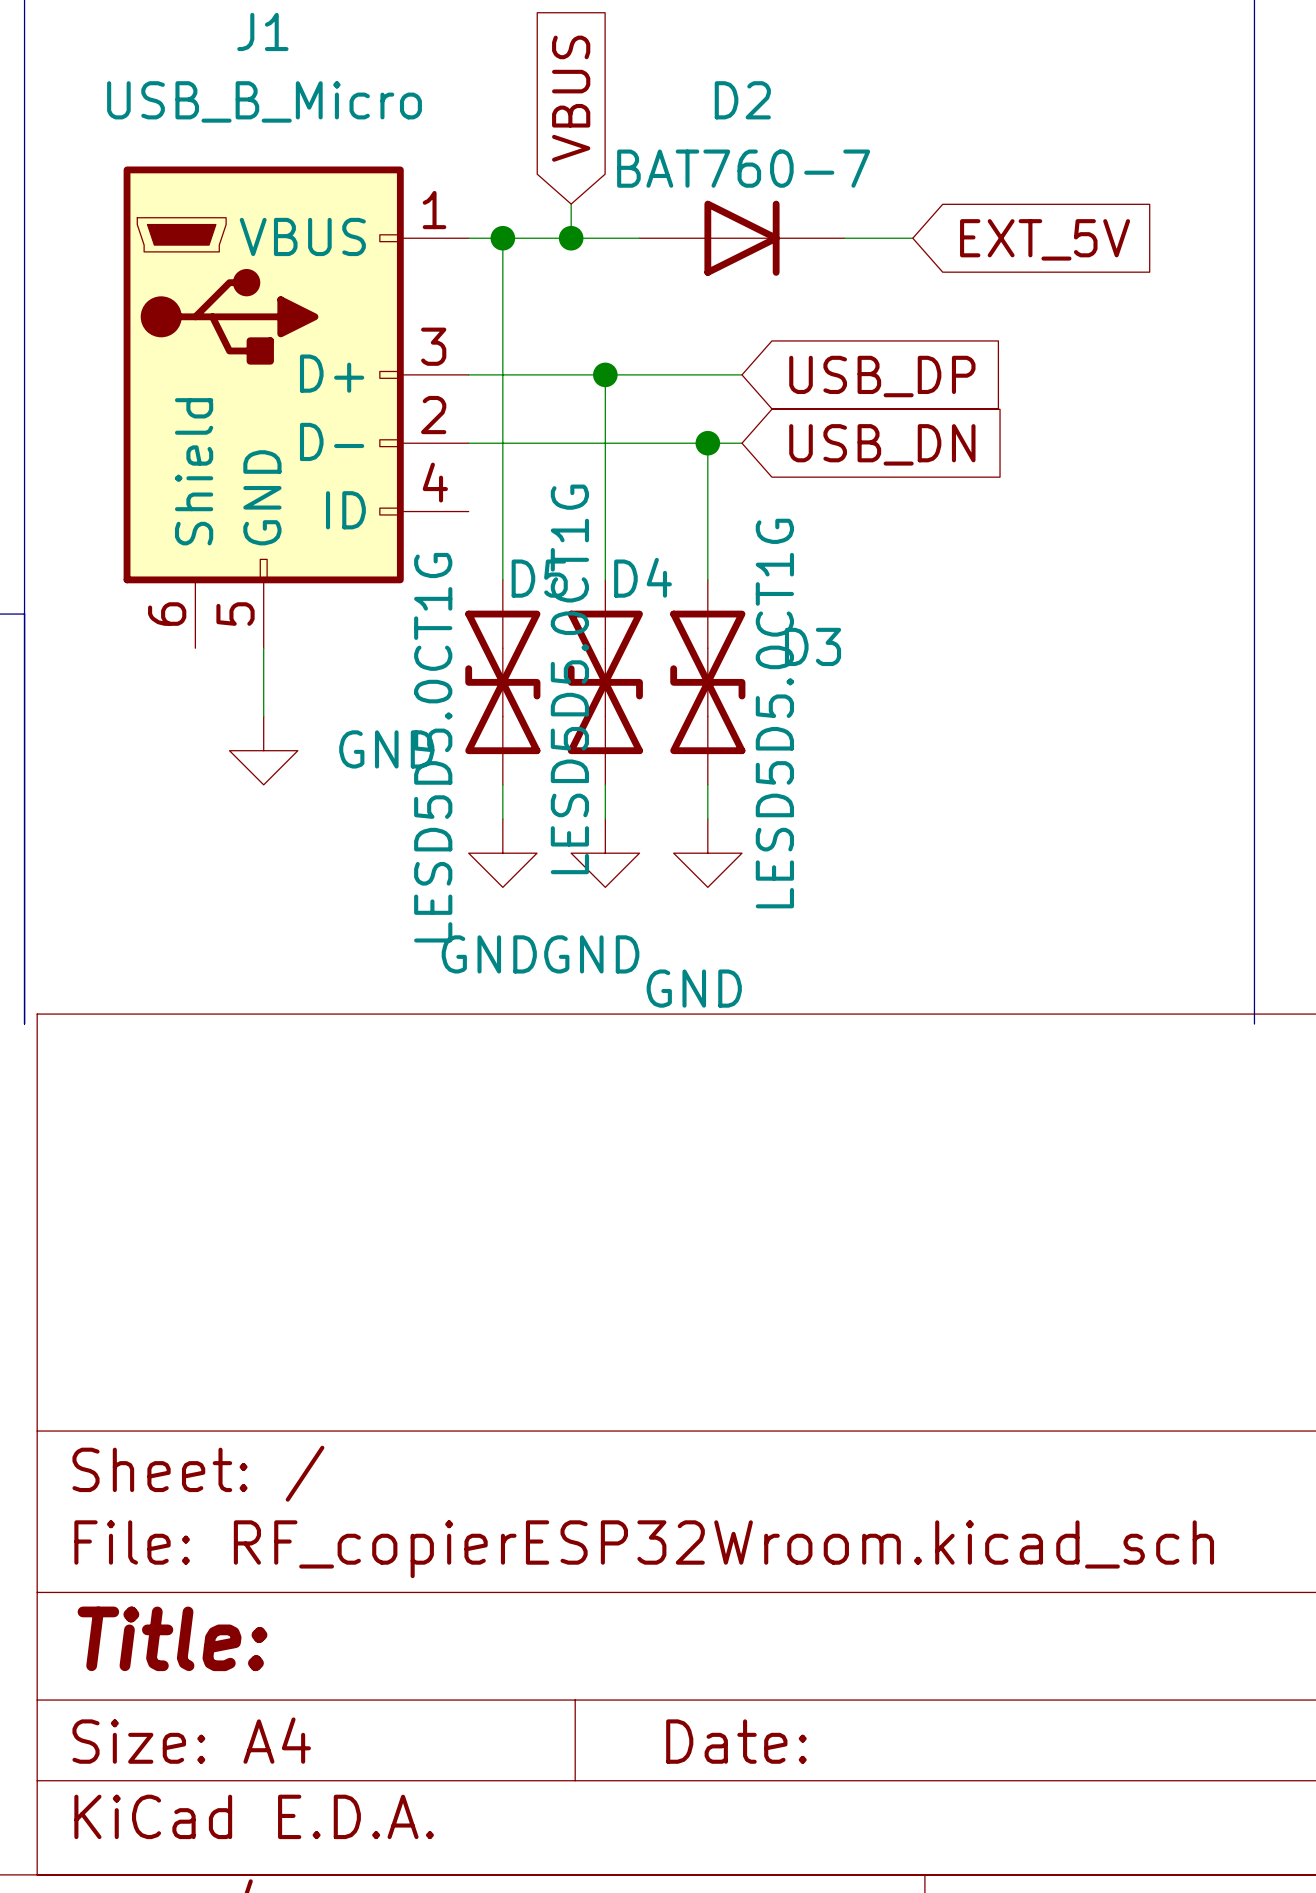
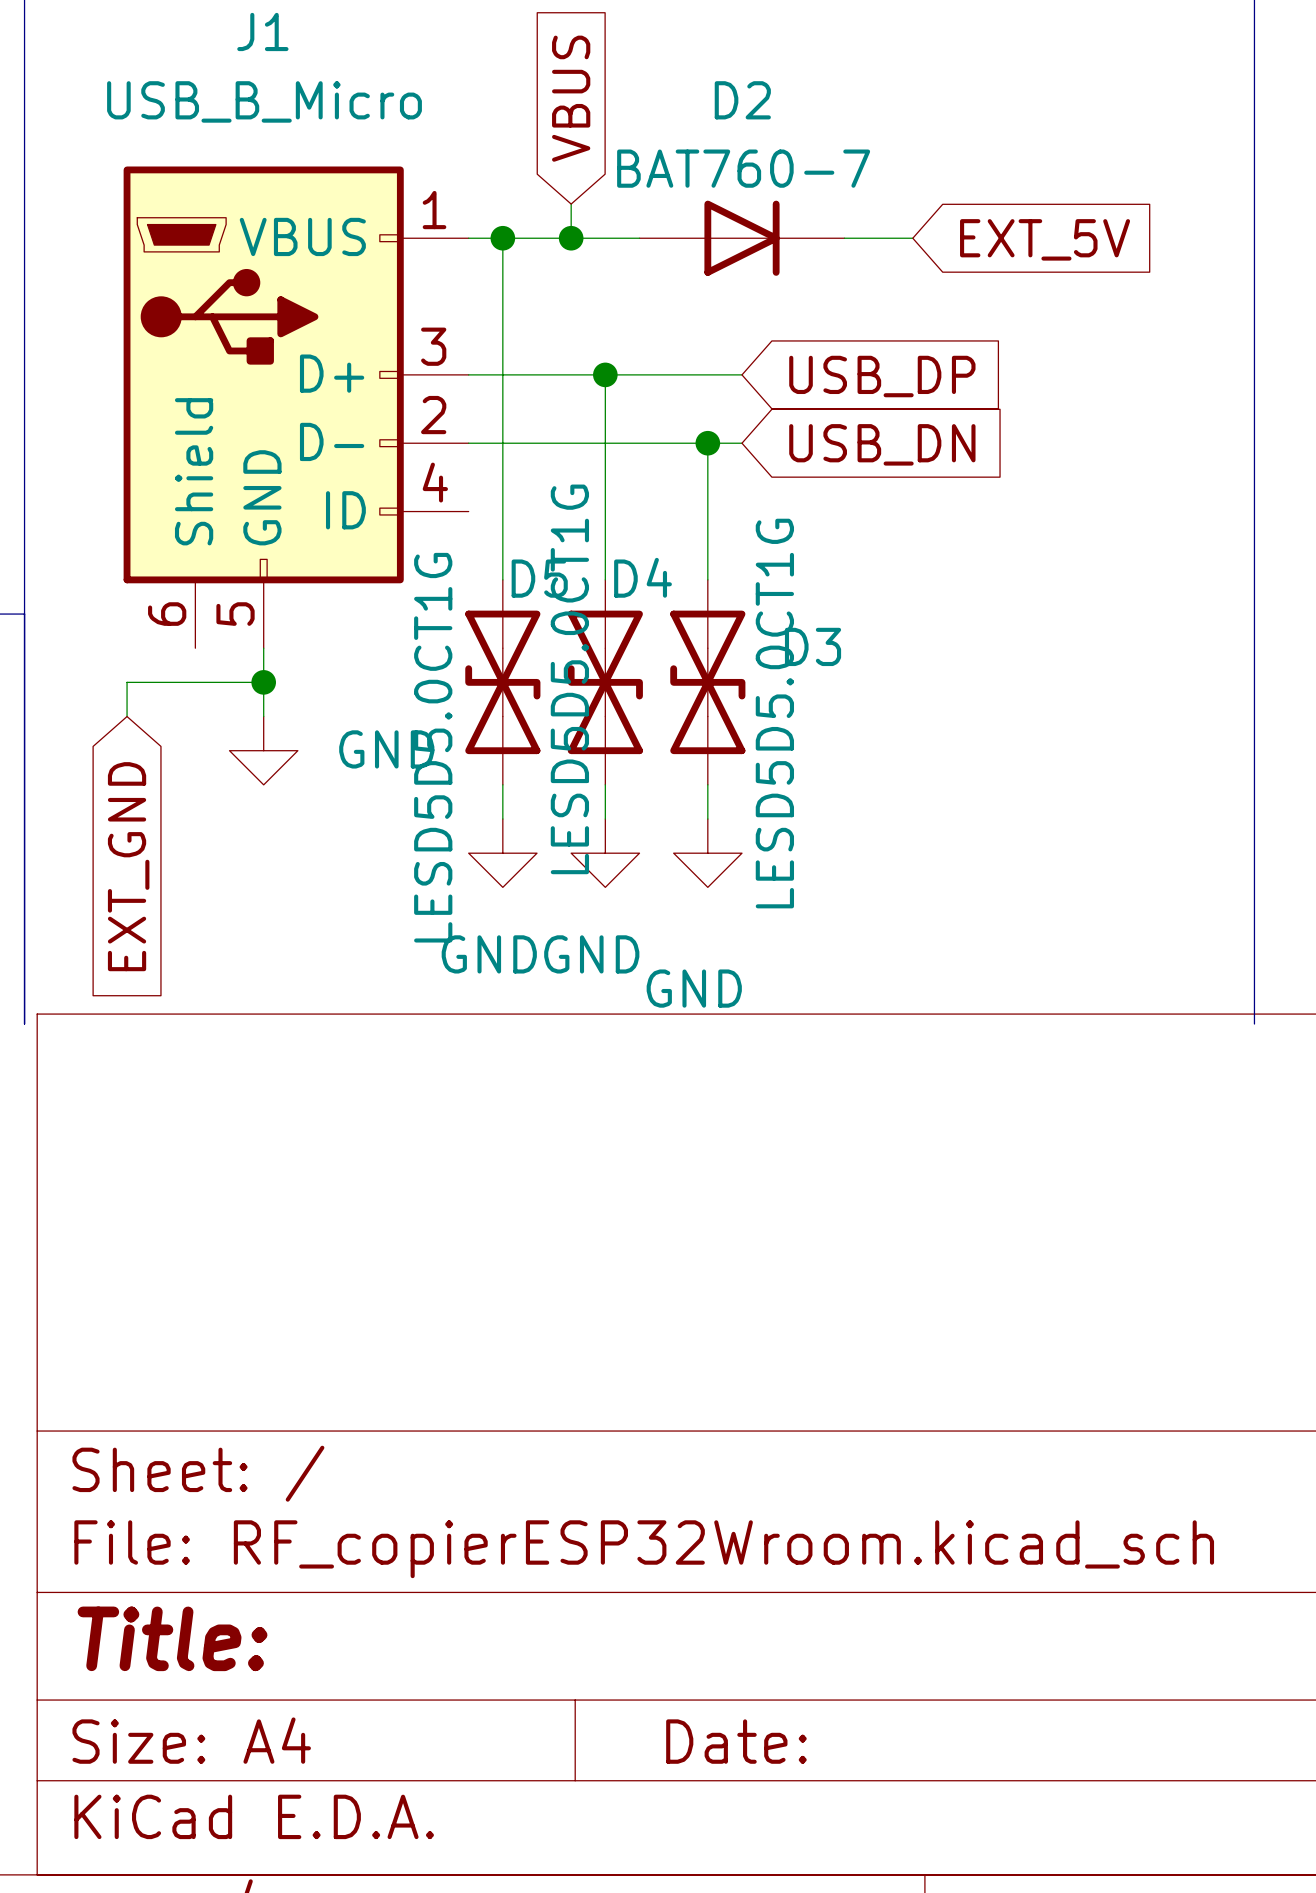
wire: none -> (263, 682) (127, 682) (127, 716)
junction: none -> (263, 682)
global label: none -> EXT_GND (128, 866)

